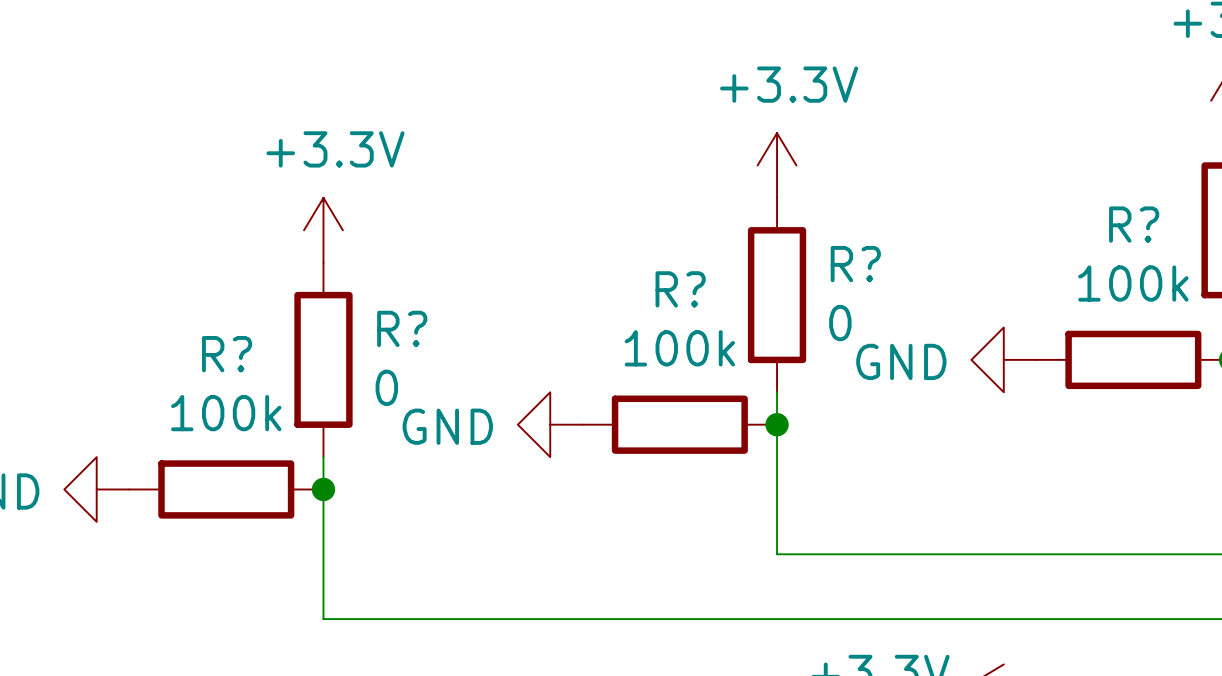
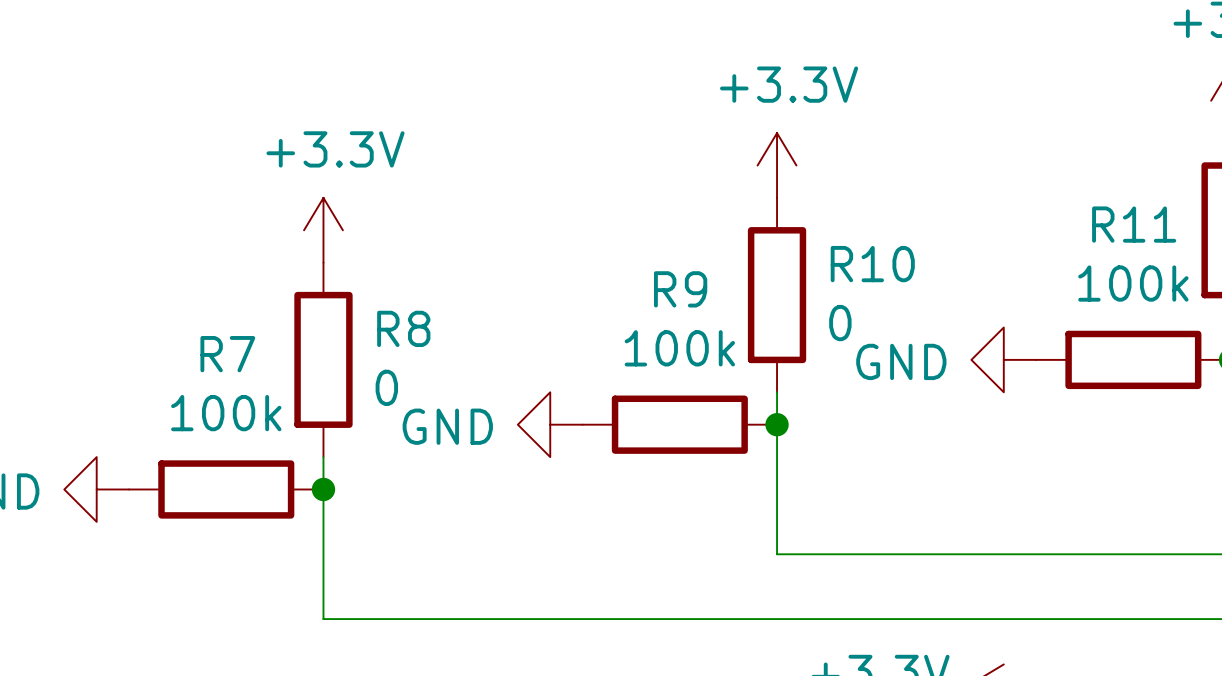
R? name: R? (1134, 224) -> R11 (1134, 224)
R? name: R? (855, 264) -> R10 (872, 264)
R? name: R? (680, 289) -> R9 (680, 289)
R? name: R? (402, 328) -> R8 (403, 328)
R? name: R? (227, 354) -> R7 (227, 354)

